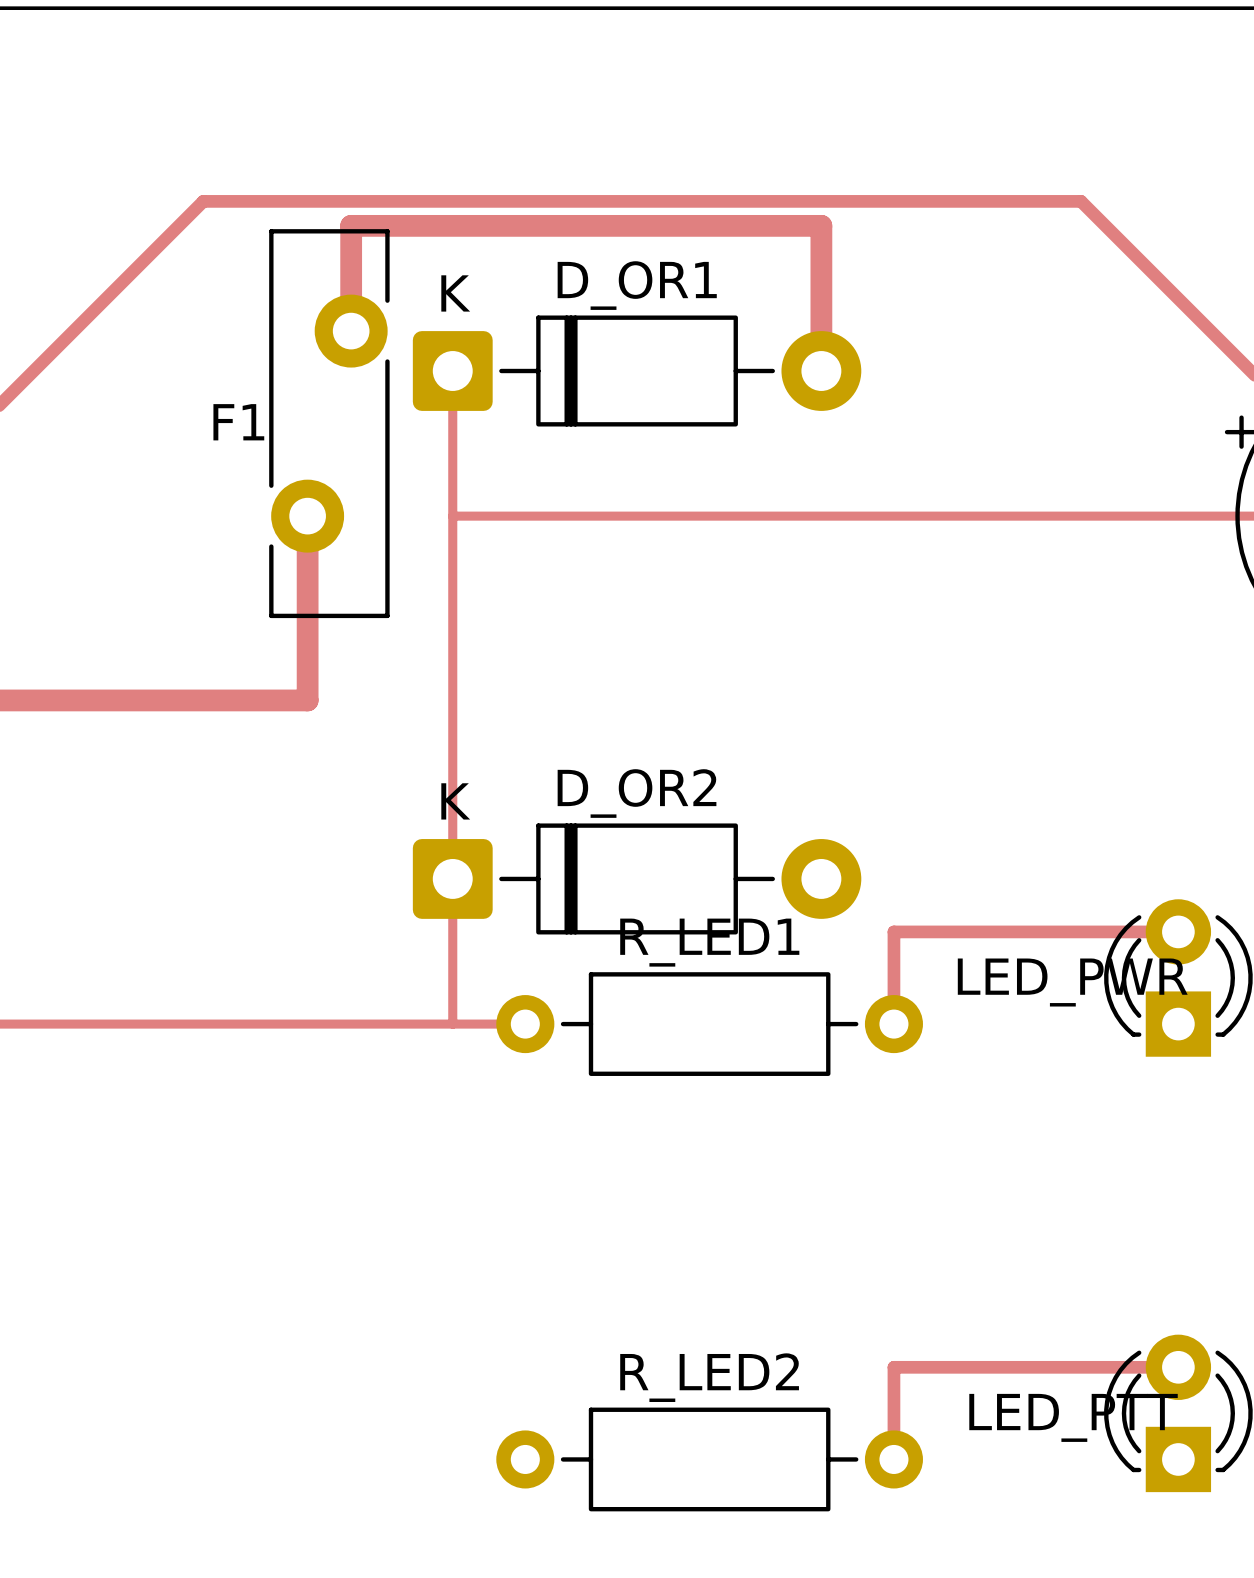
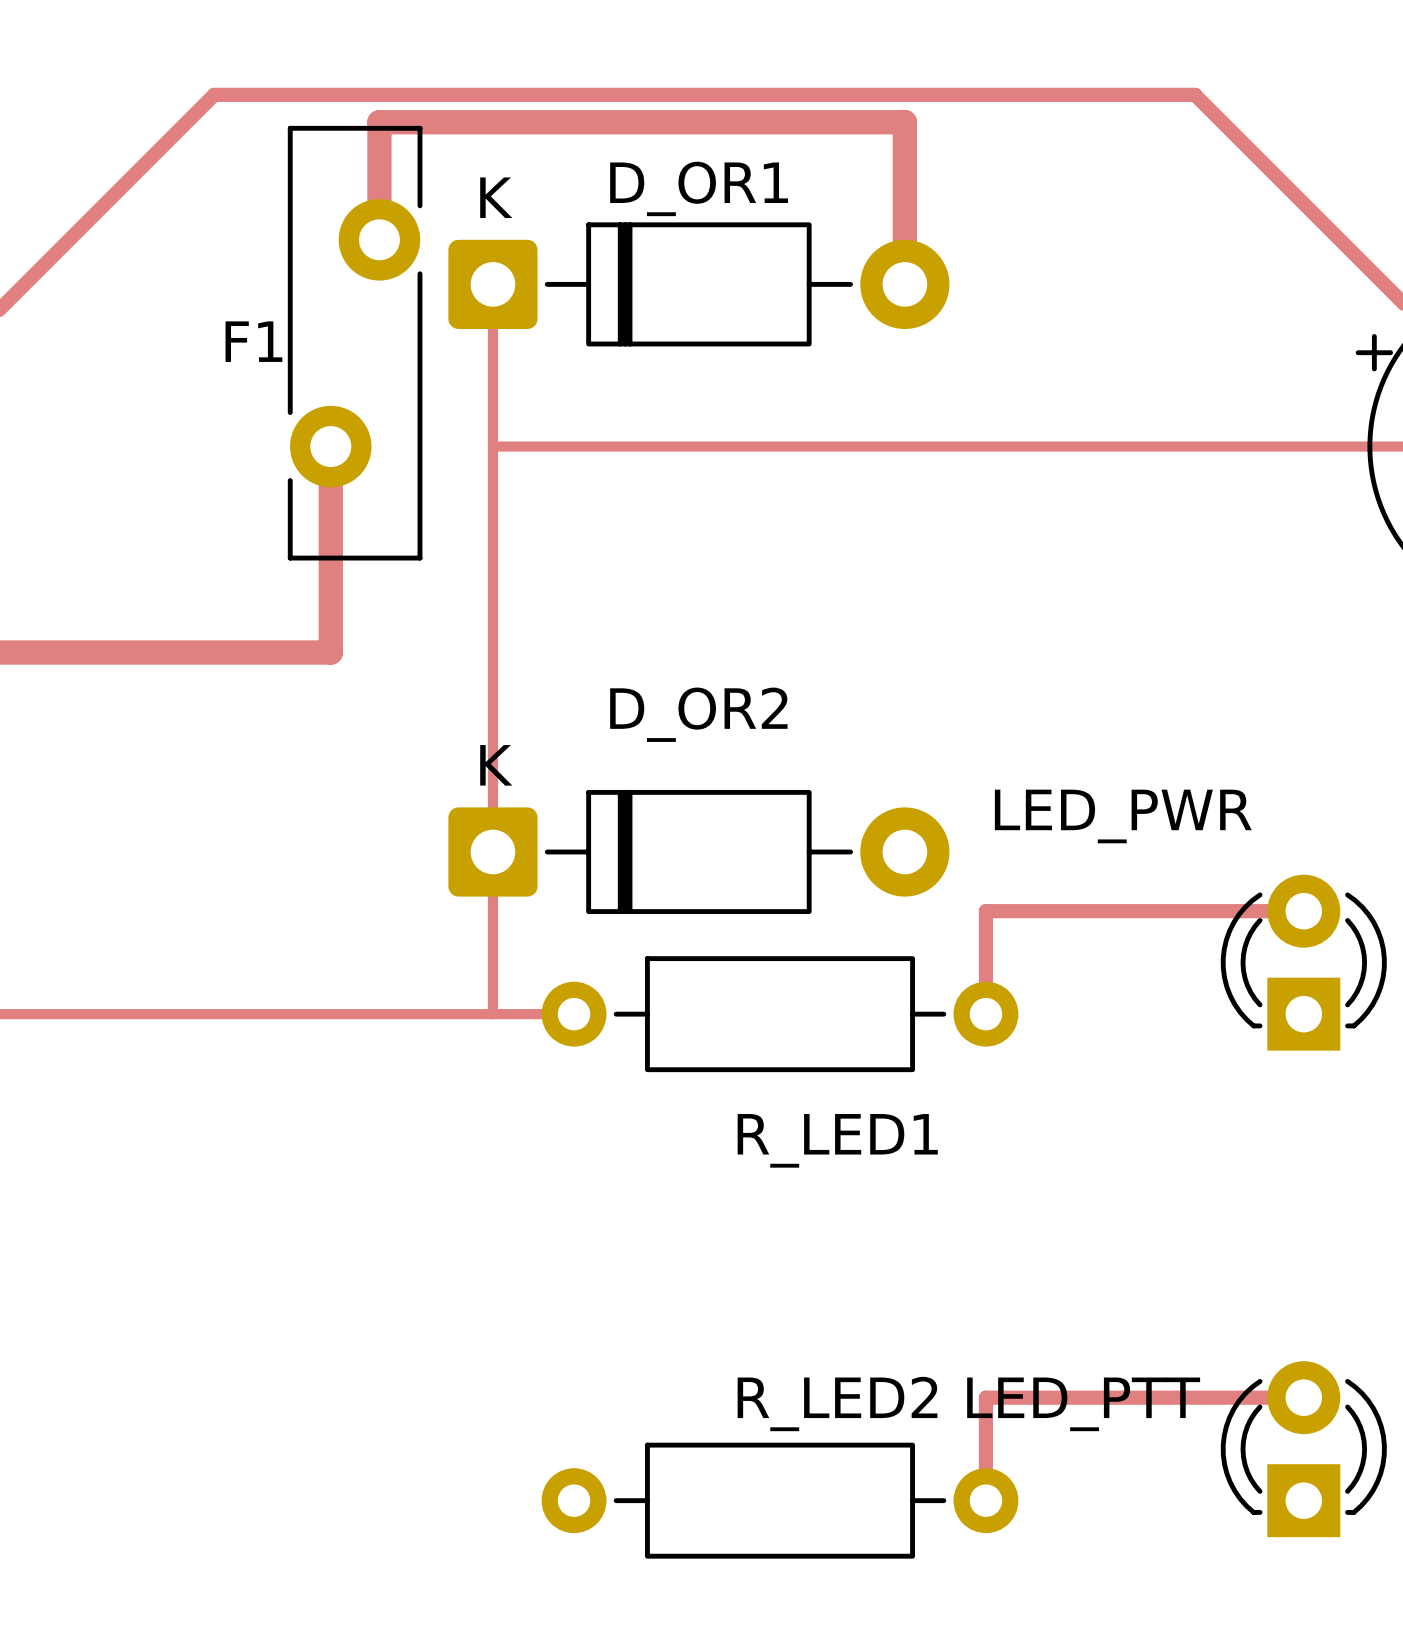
D_OR2 name position: D_OR2 (637, 793) -> D_OR2 (698, 714)
R_LED1 name position: R_LED1 (709, 942) -> R_LED1 (837, 1140)
LED_PWR name position: LED_PWR (1072, 982) -> LED_PWR (1123, 816)
R_LED2 name position: R_LED2 (709, 1377) -> R_LED2 (837, 1403)
LED_PTT name position: LED_PTT (1073, 1417) -> LED_PTT (1083, 1404)

